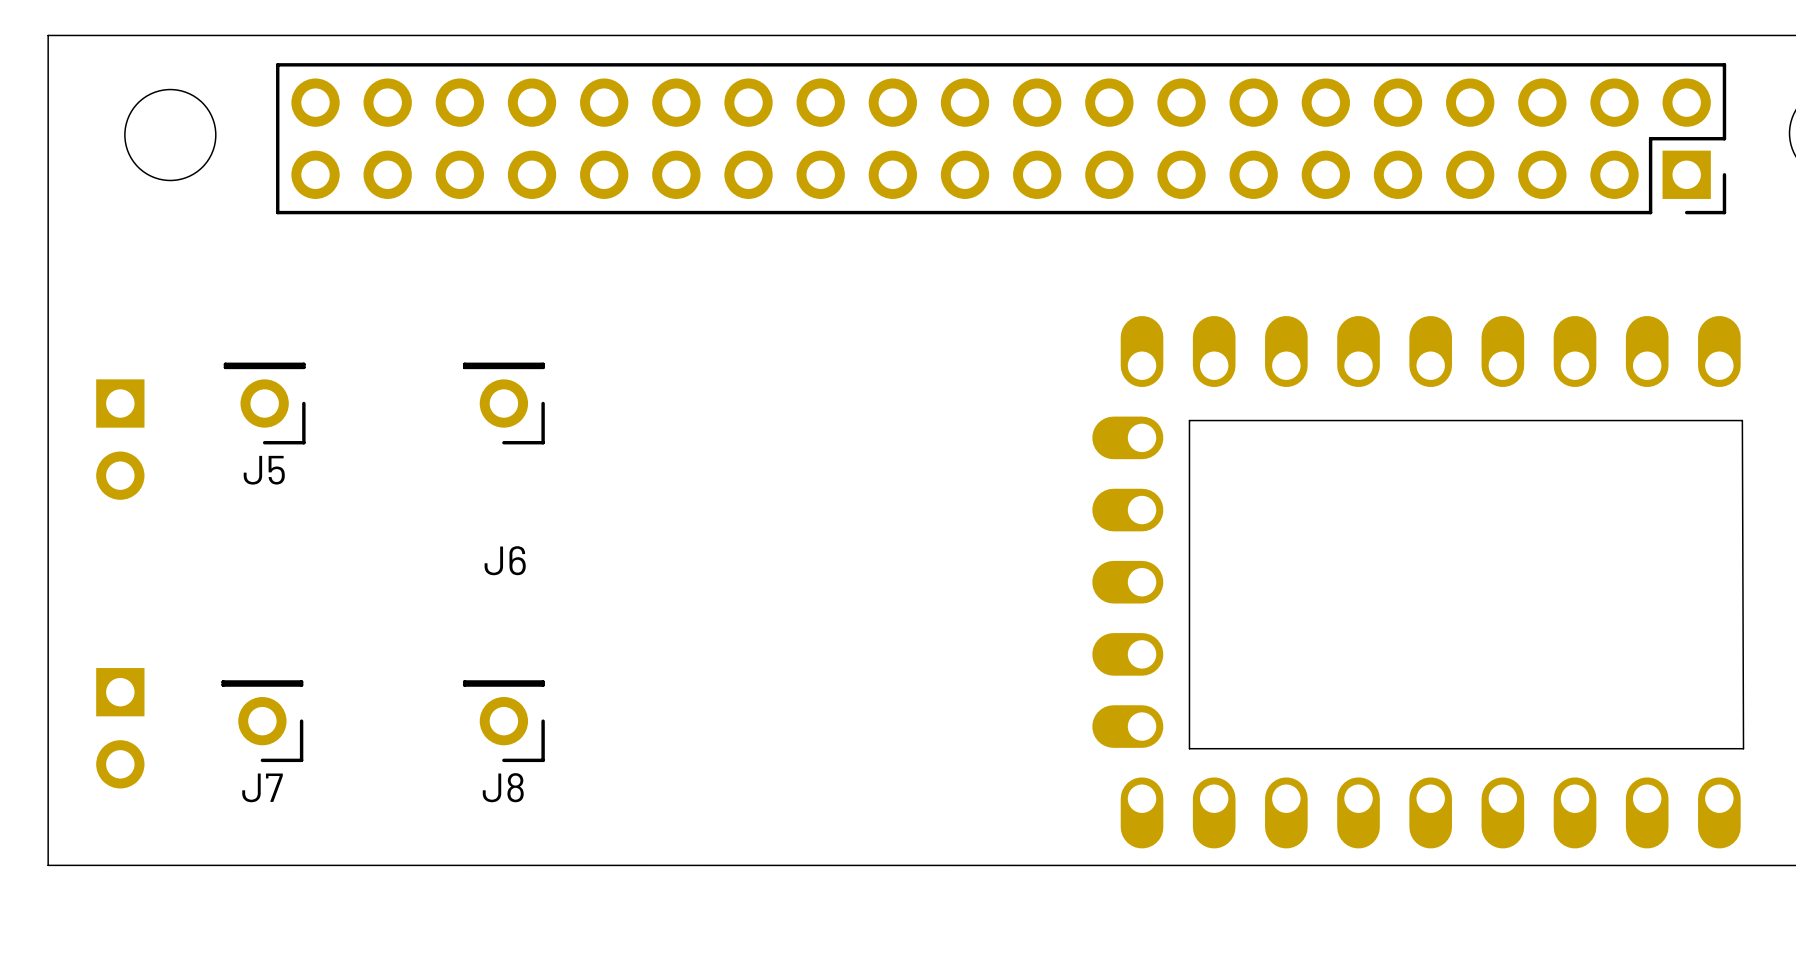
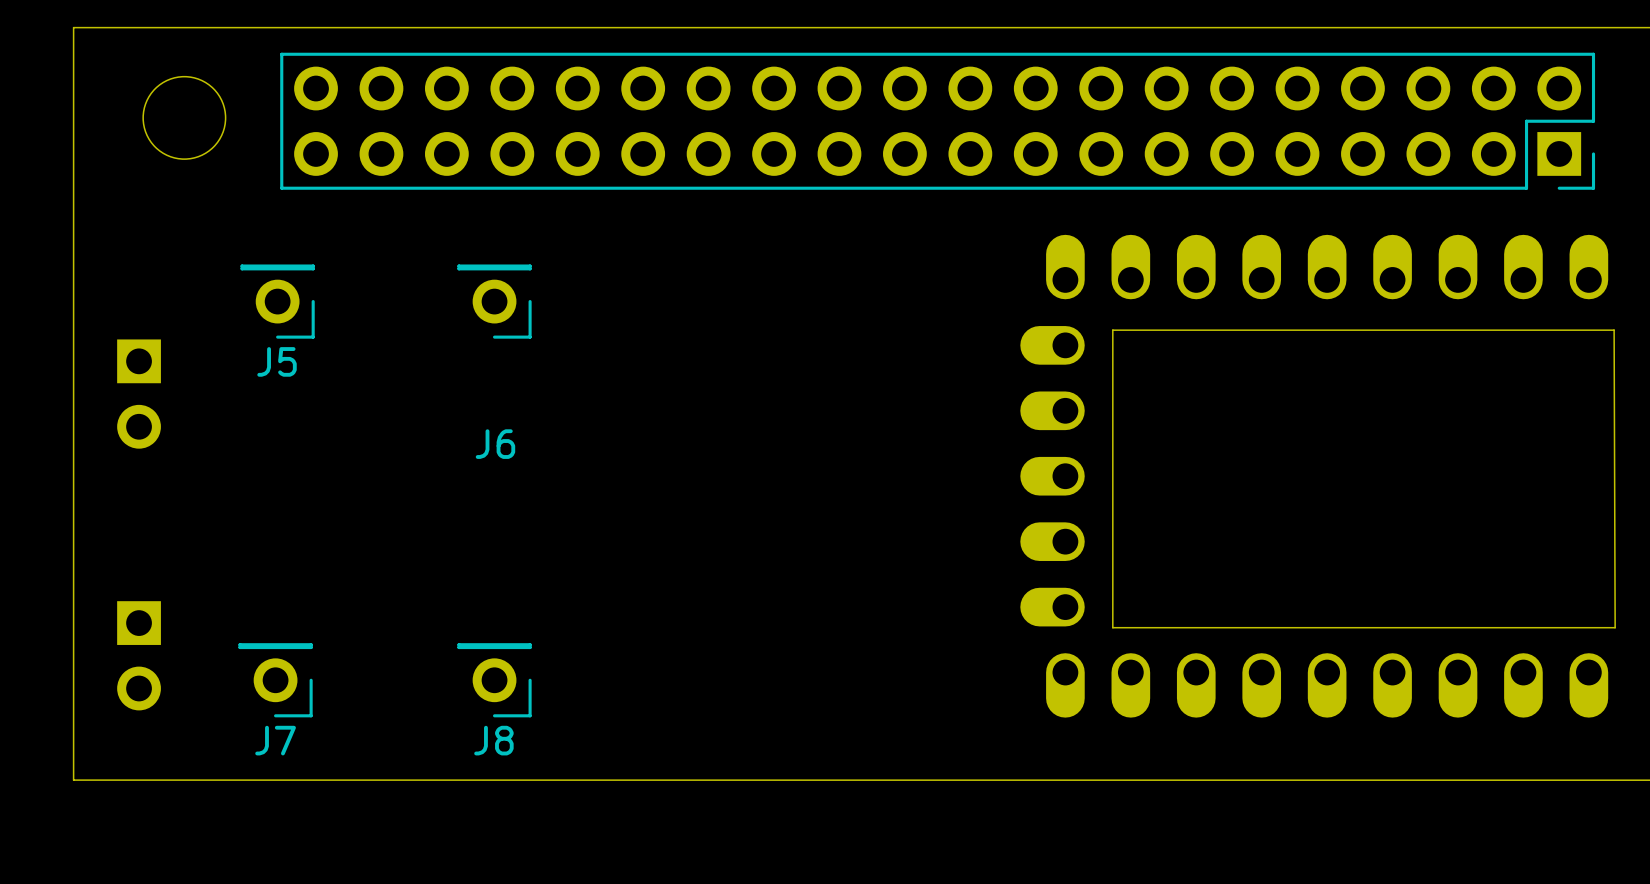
J5 position: (264, 403) -> (277, 301)
J6 position: (503, 403) -> (494, 301)
board edge: (1742, 420) (1743, 748) (1189, 748) (1189, 420) (1742, 420) -> (1614, 330) (1615, 627) (1112, 627) (1112, 330) (1614, 330)
part position: (1416, 582) -> (1314, 476)
J7 position: (262, 721) -> (275, 680)
J8 position: (503, 721) -> (494, 680)

